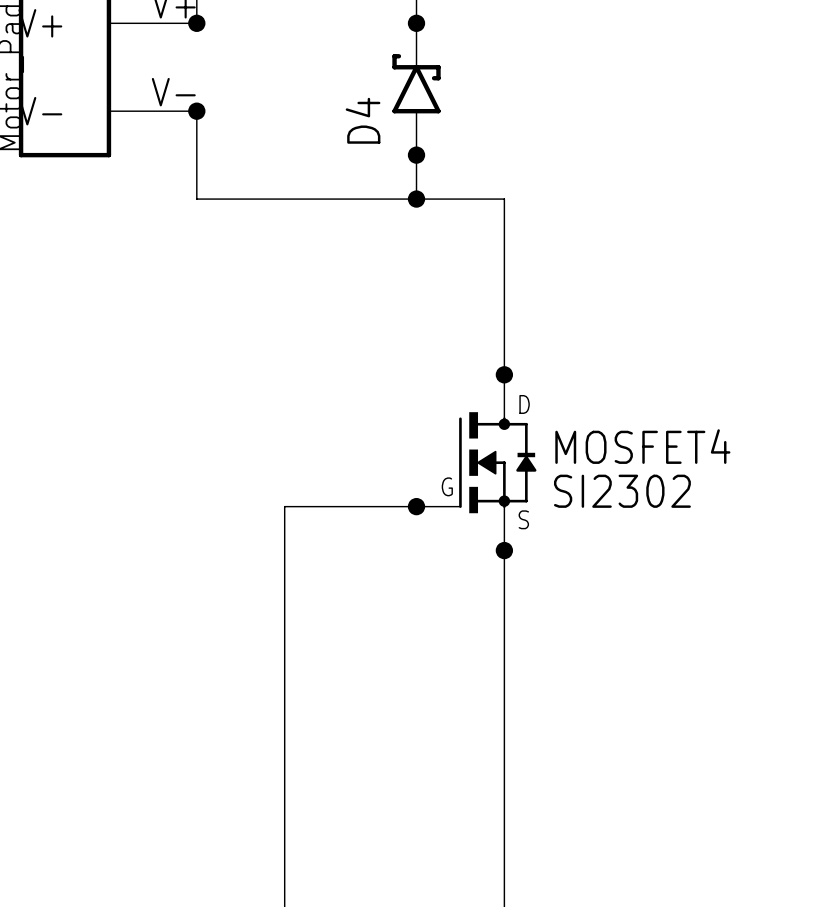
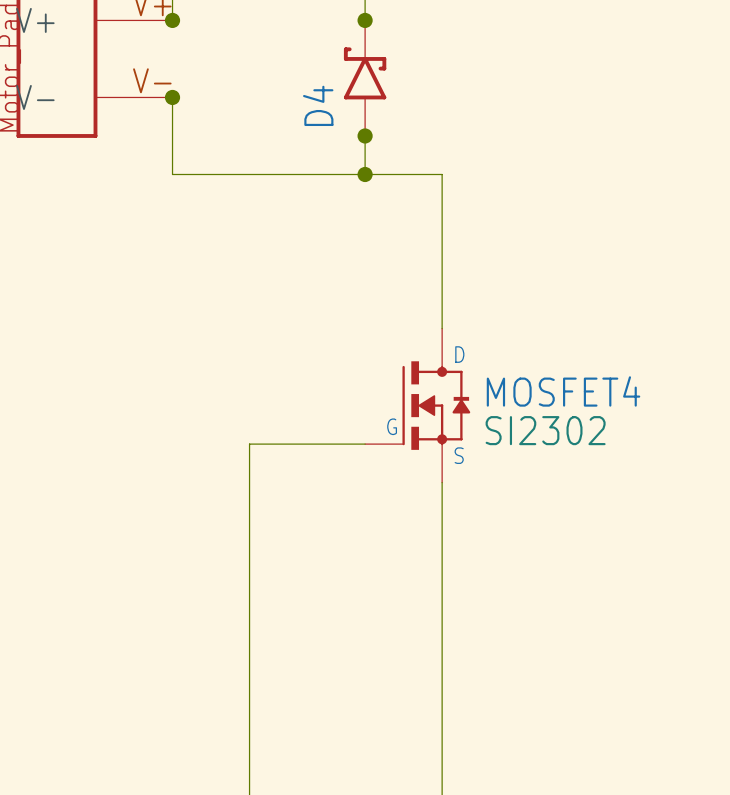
junction: (504, 374) -> none
junction: (416, 506) -> none
junction: (504, 550) -> none

